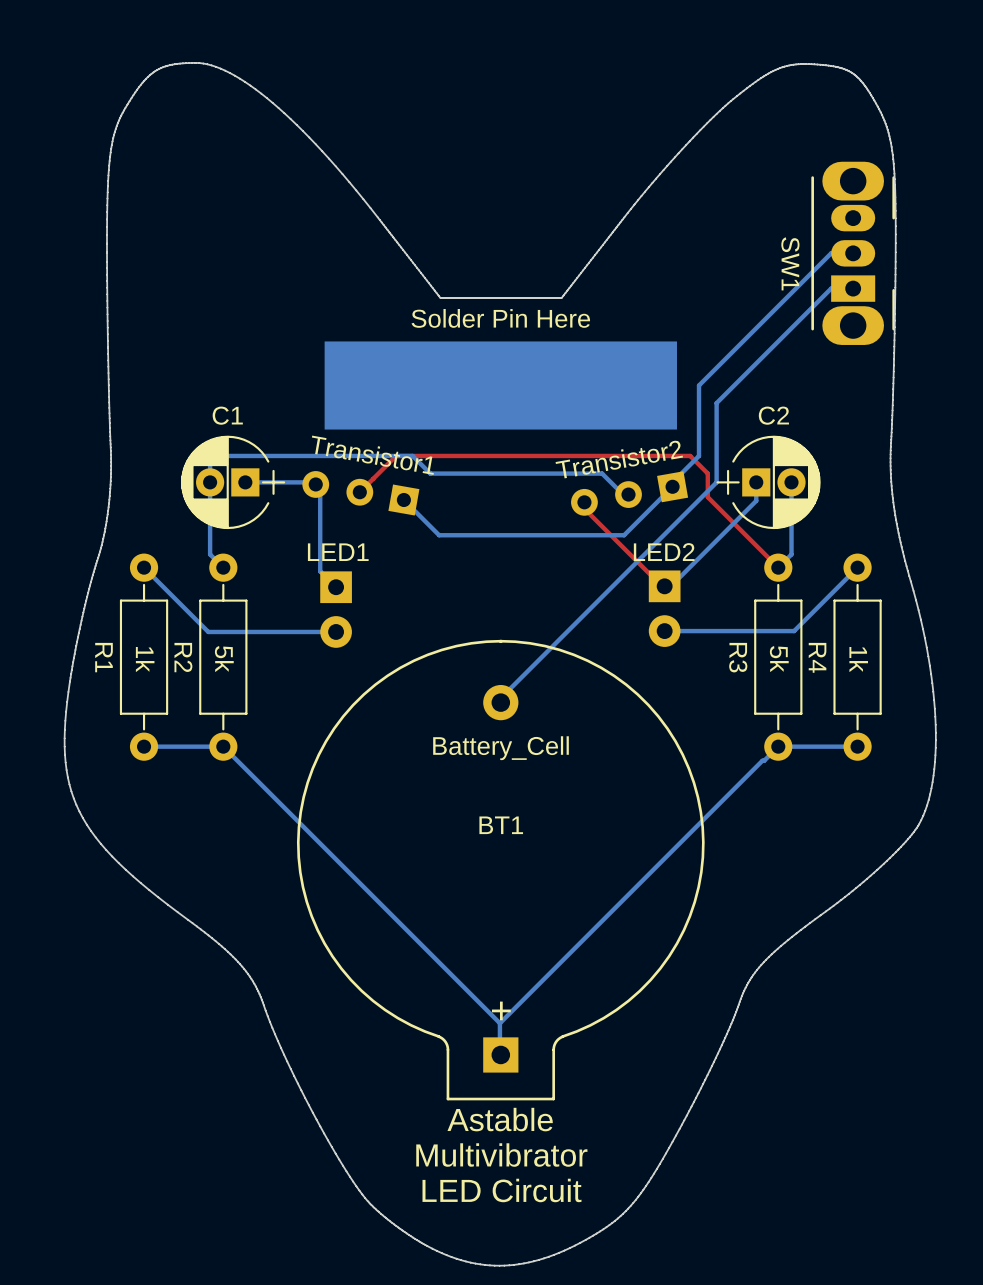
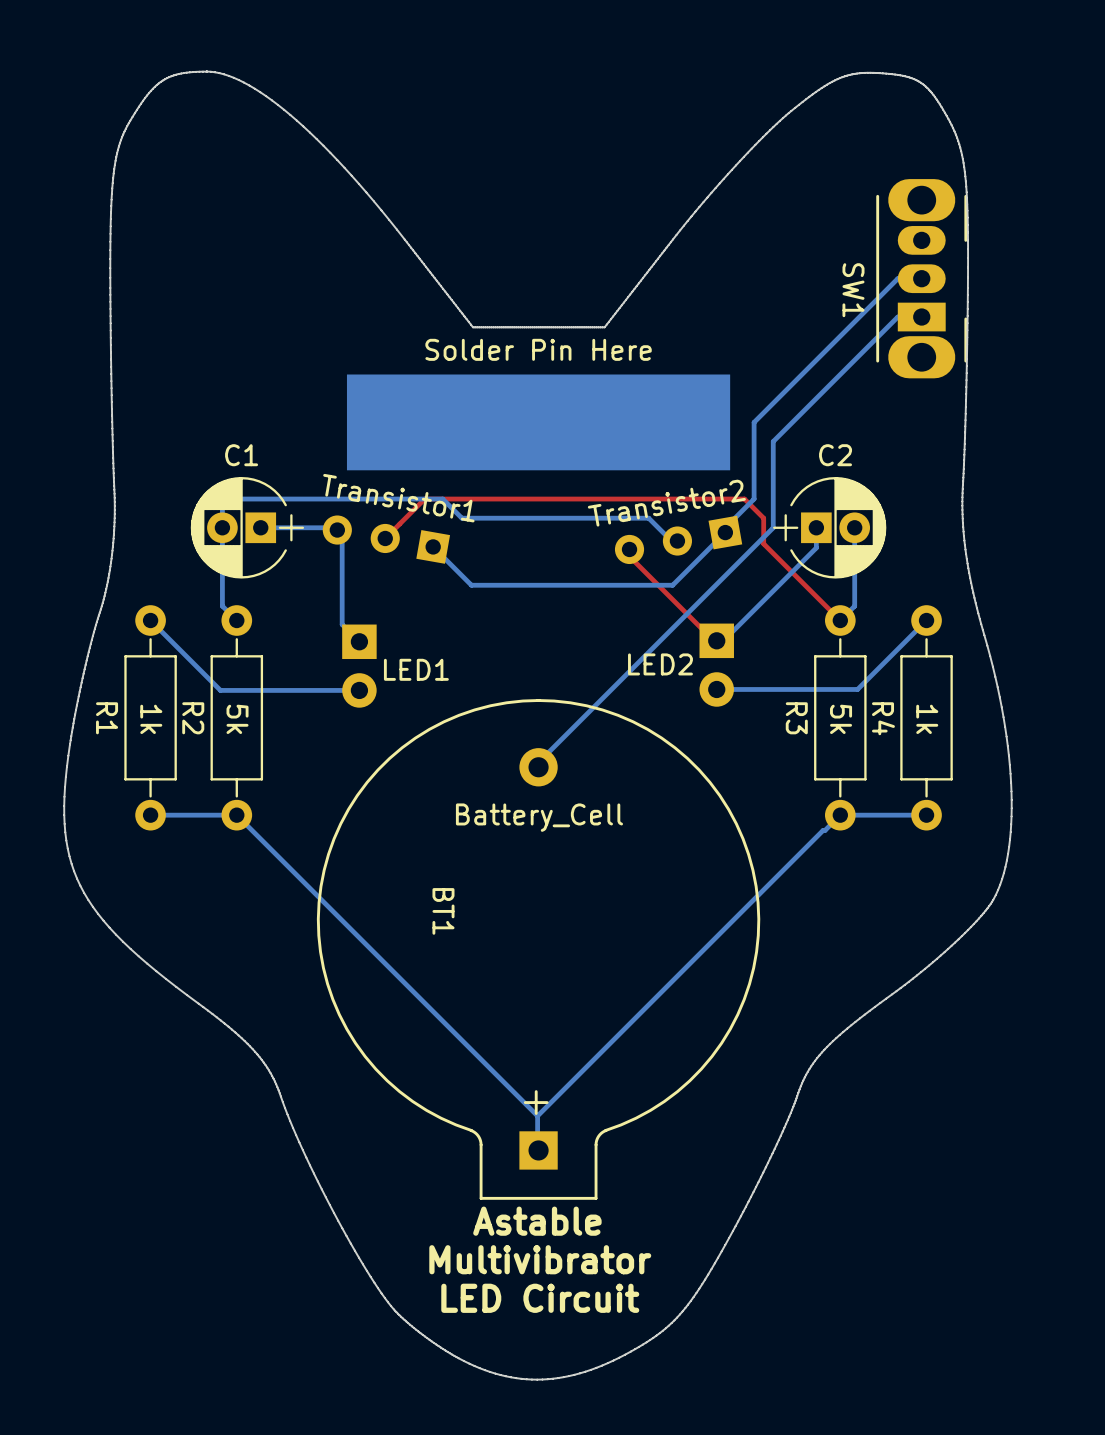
LED1 name position: LED1 (338, 552) -> LED1 (416, 669)
LED2 name position: LED2 (664, 552) -> LED2 (660, 664)
BT1 name rotation: 0° (501, 825) -> 90° clockwise (443, 911)
BT1 name position: BT1 (501, 825) -> BT1 (443, 911)

